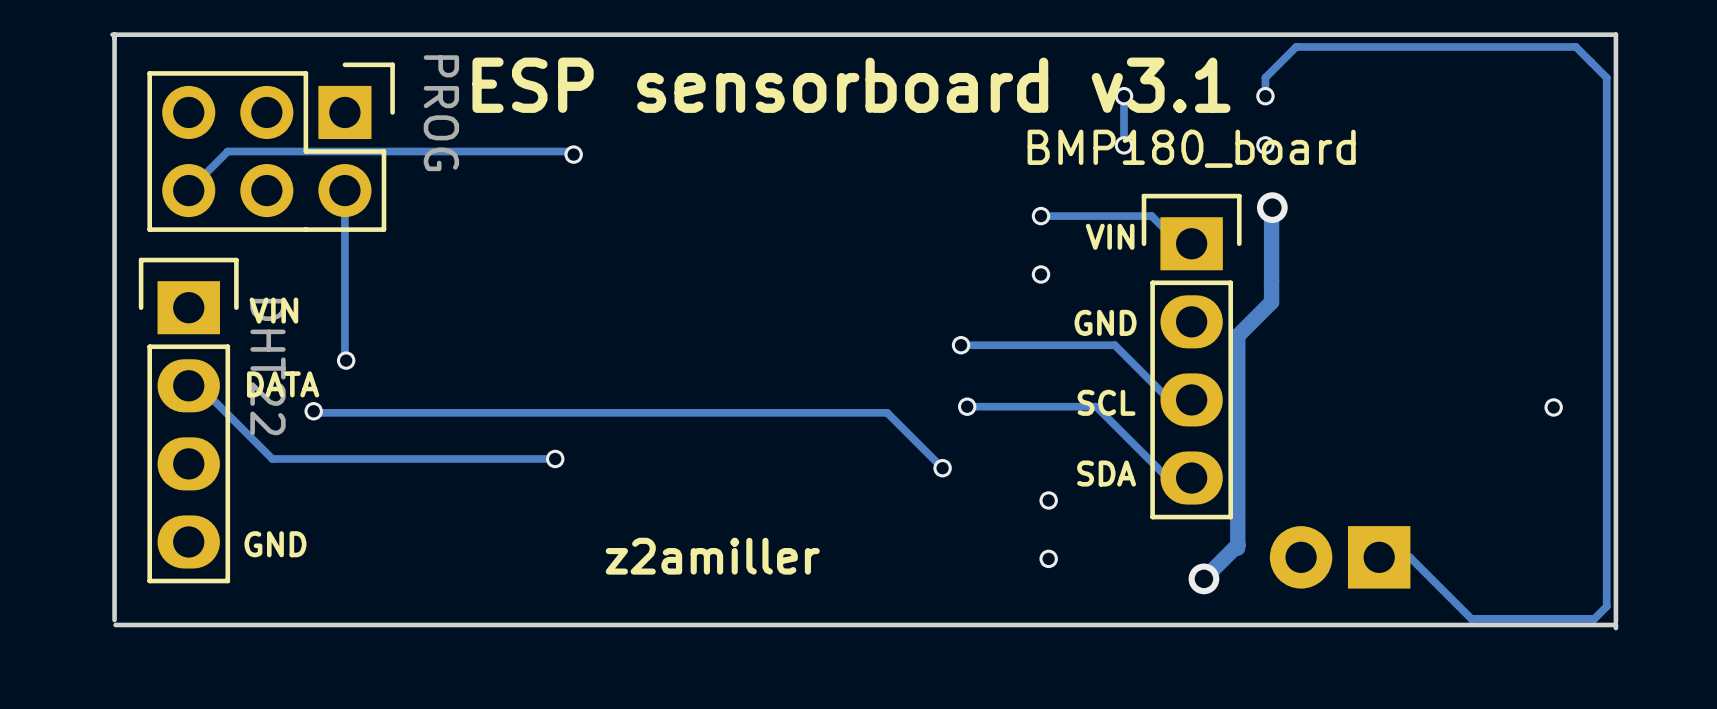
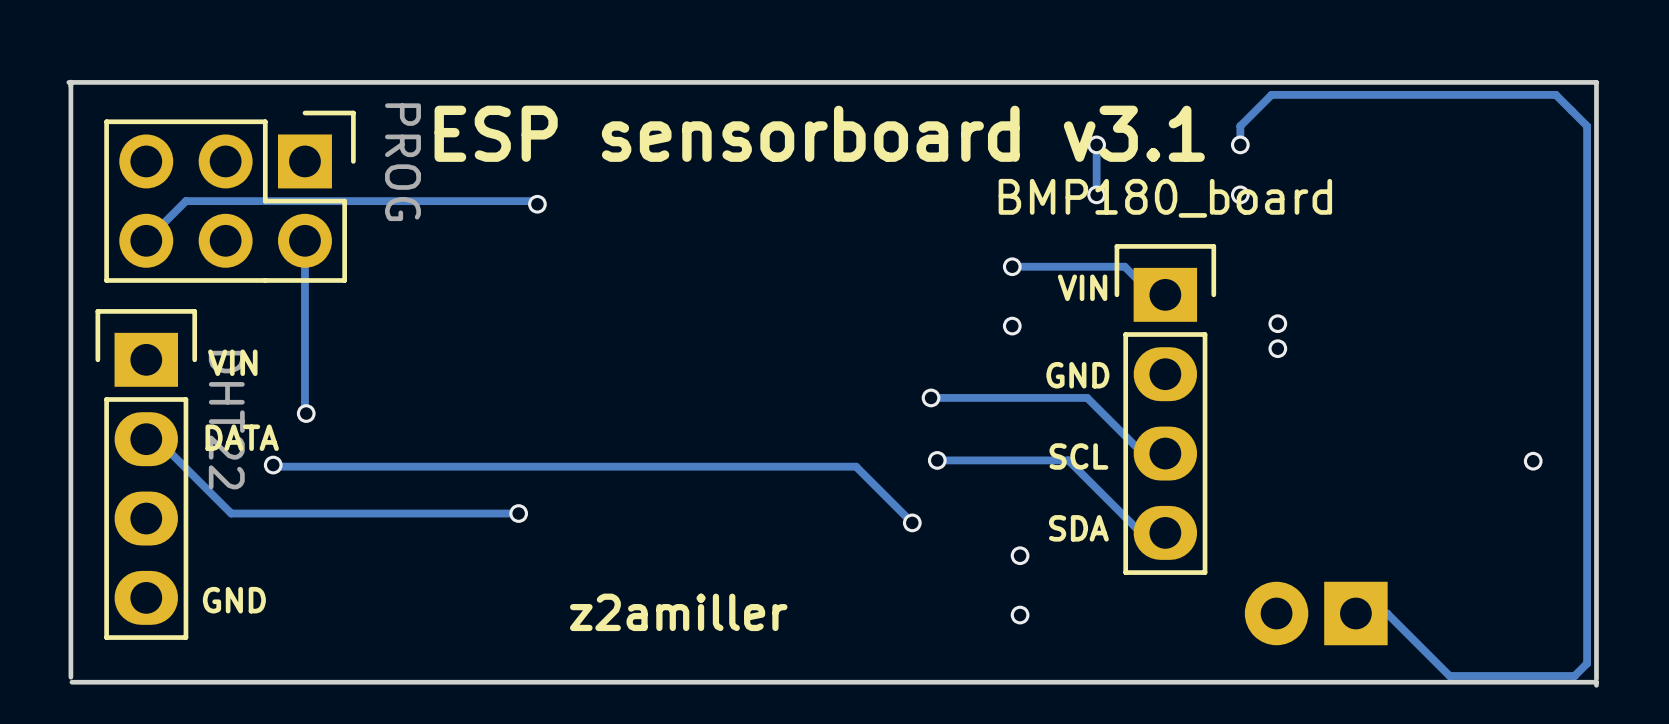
track: (1272, 207) (1271, 302) (1237, 335) (1237, 548) -> none
via: (1272, 207) -> none
via: none -> (1277, 323)
via: none -> (1277, 348)
track: (1237, 545) (1203, 578) -> none
via: (1203, 578) -> none

